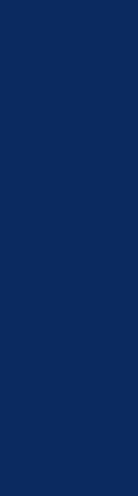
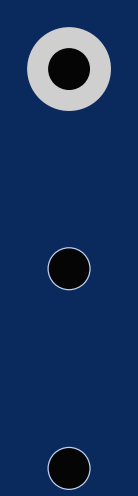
part: none -> (69, 69)
part: none -> (69, 268)
part: none -> (69, 468)

